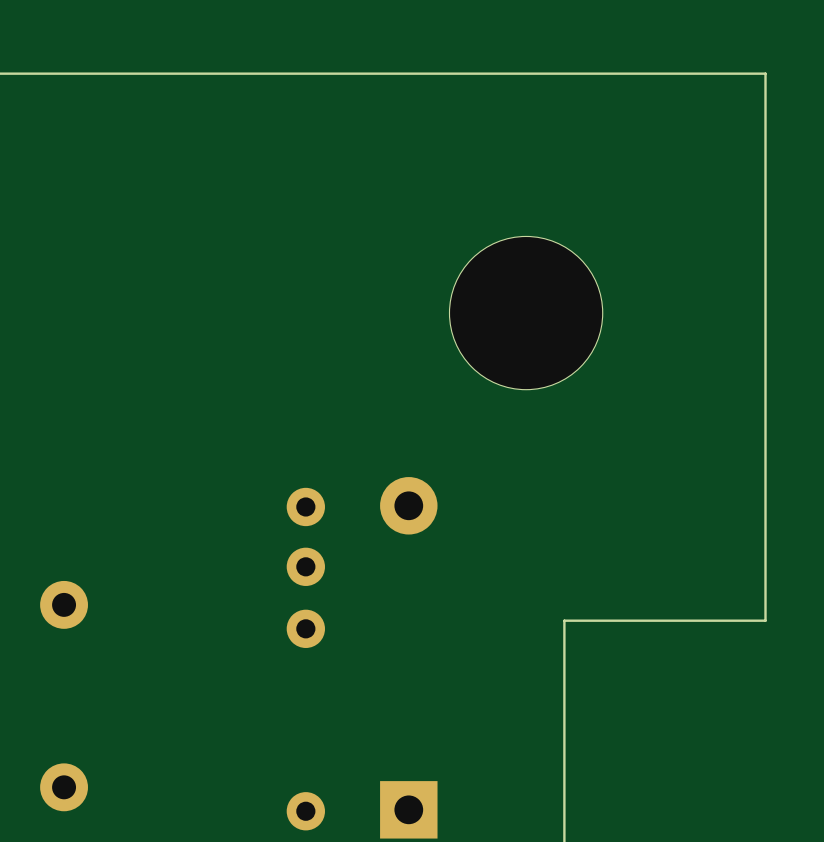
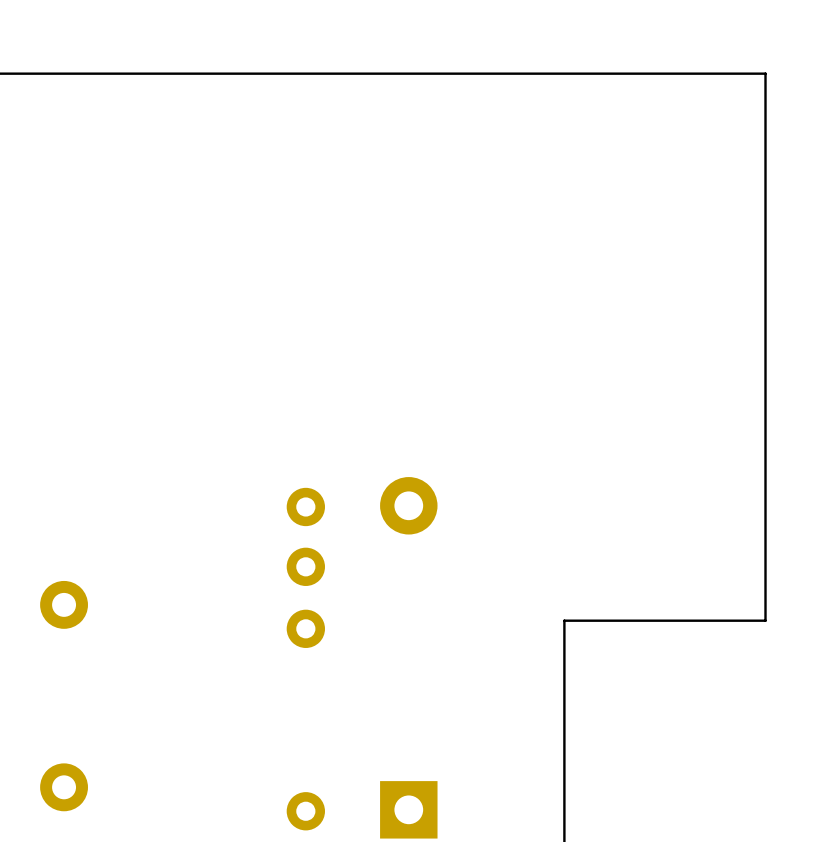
part: (526, 313) -> none

